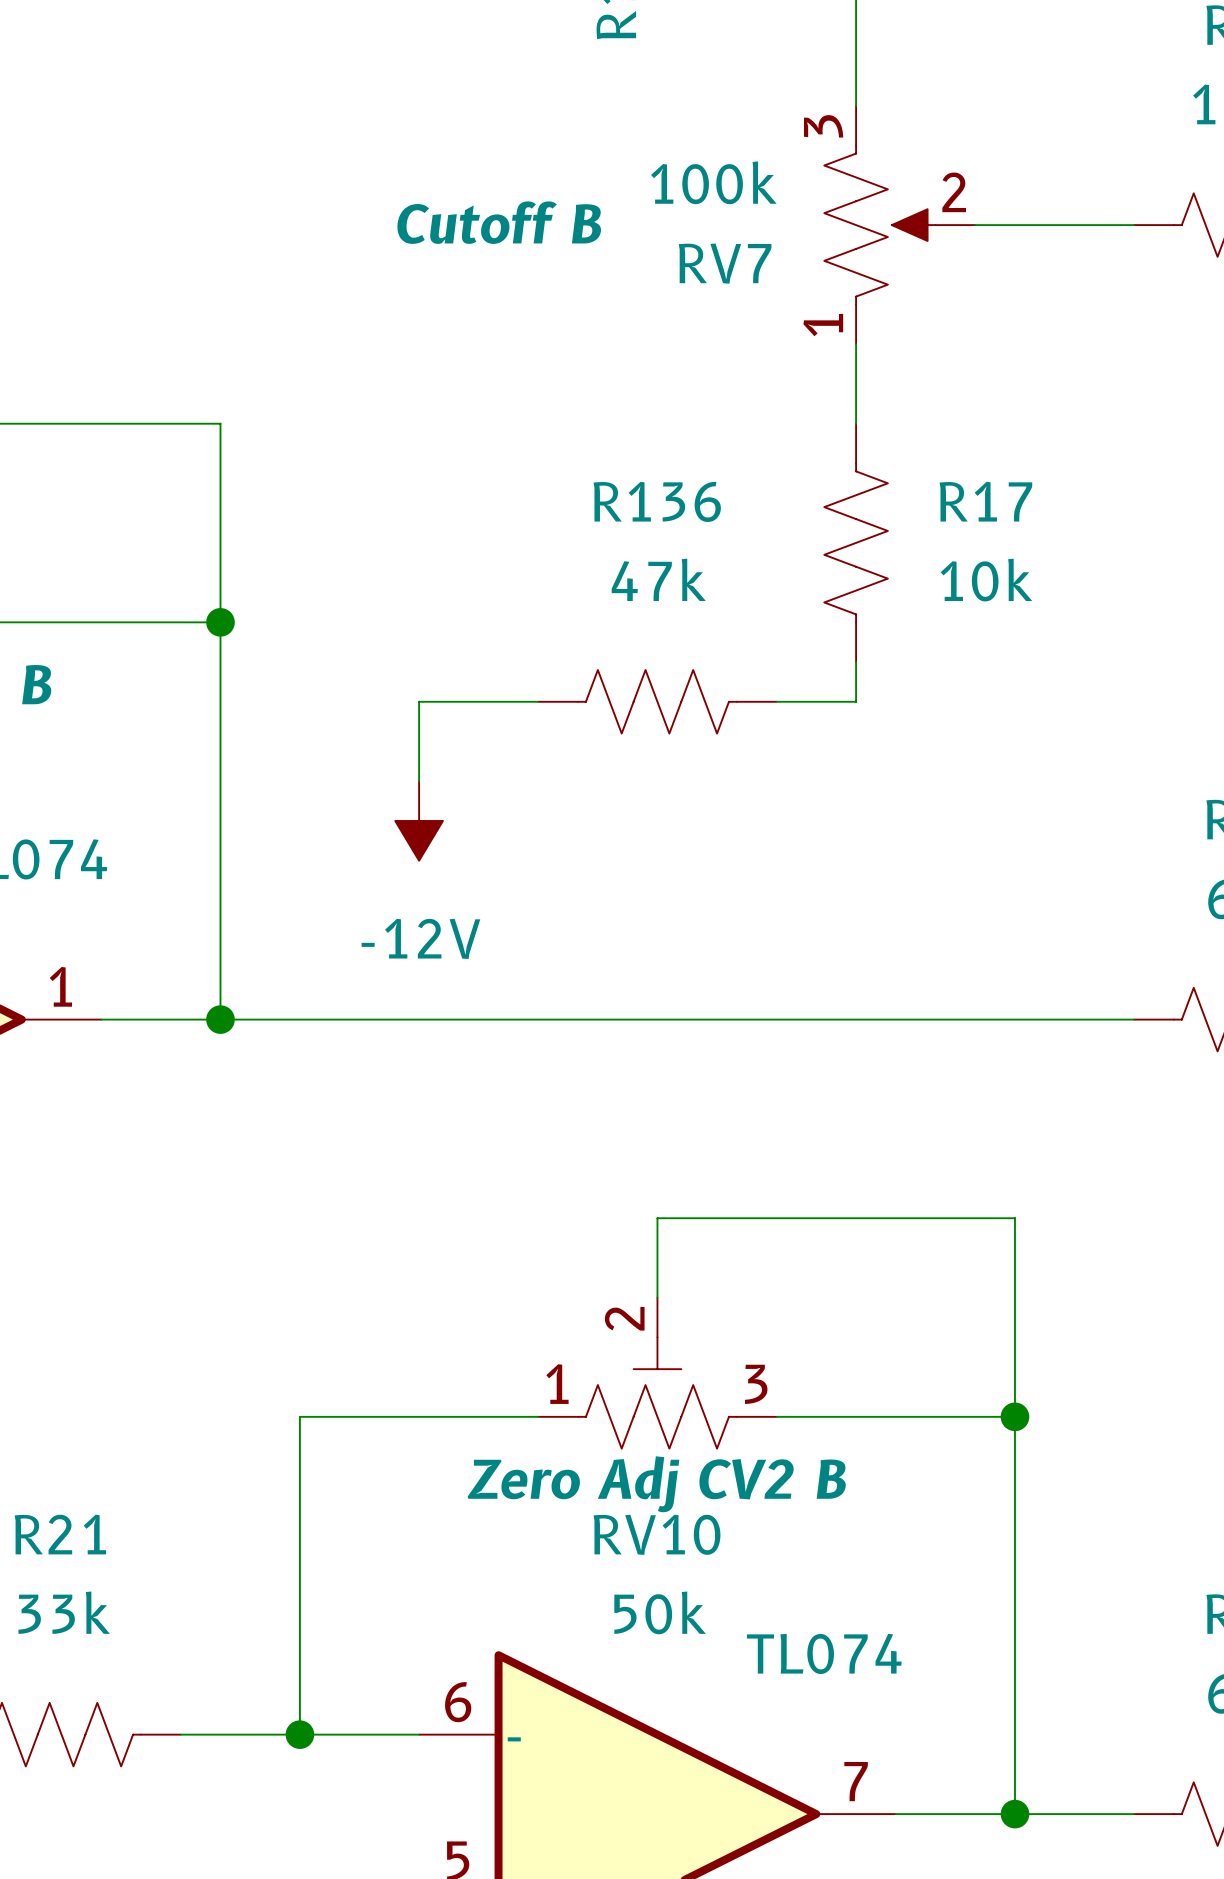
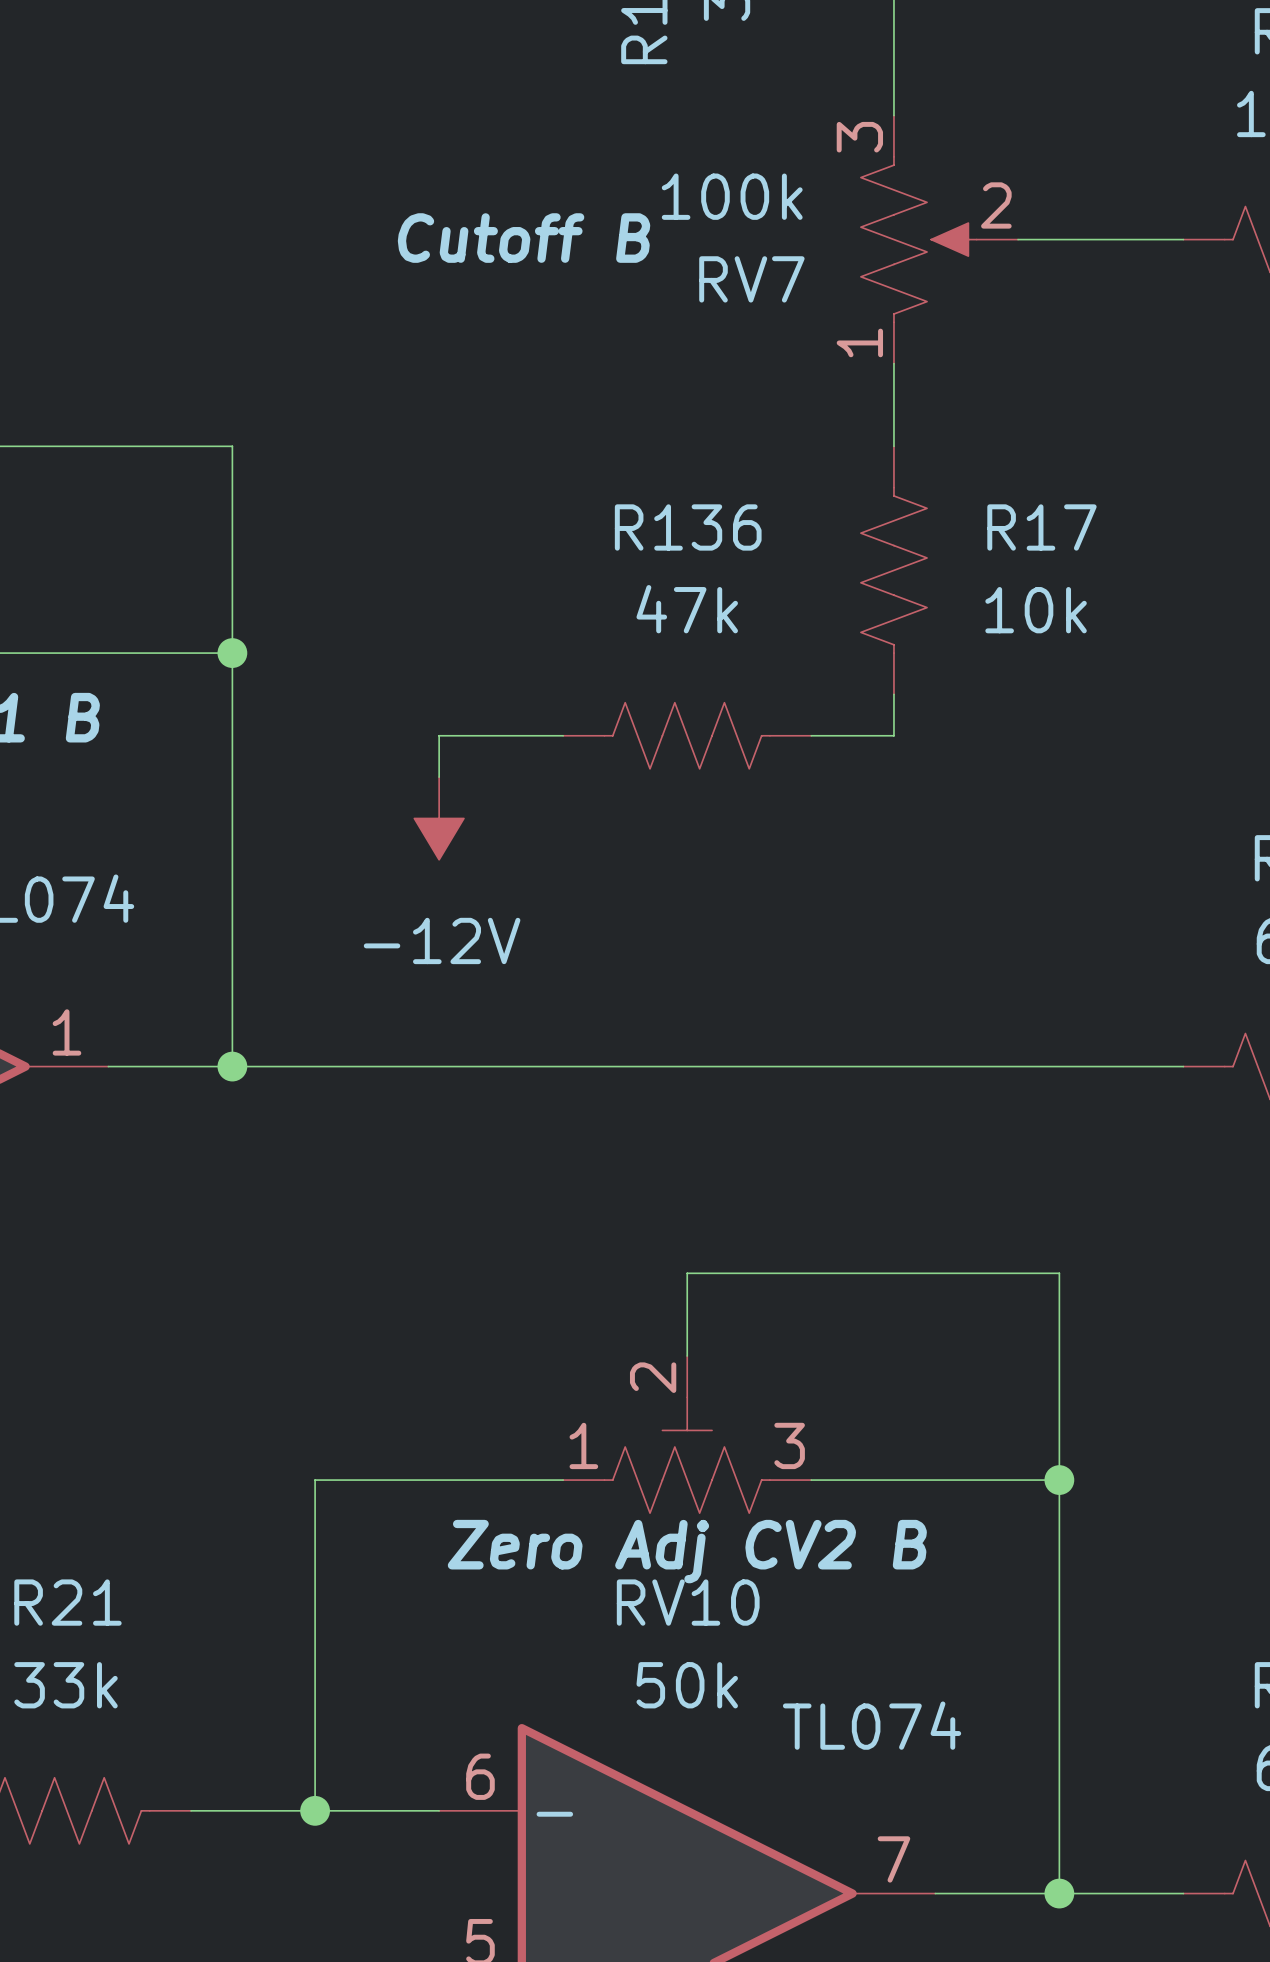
power symbol position: -12V (419, 820) -> -12V (439, 818)

